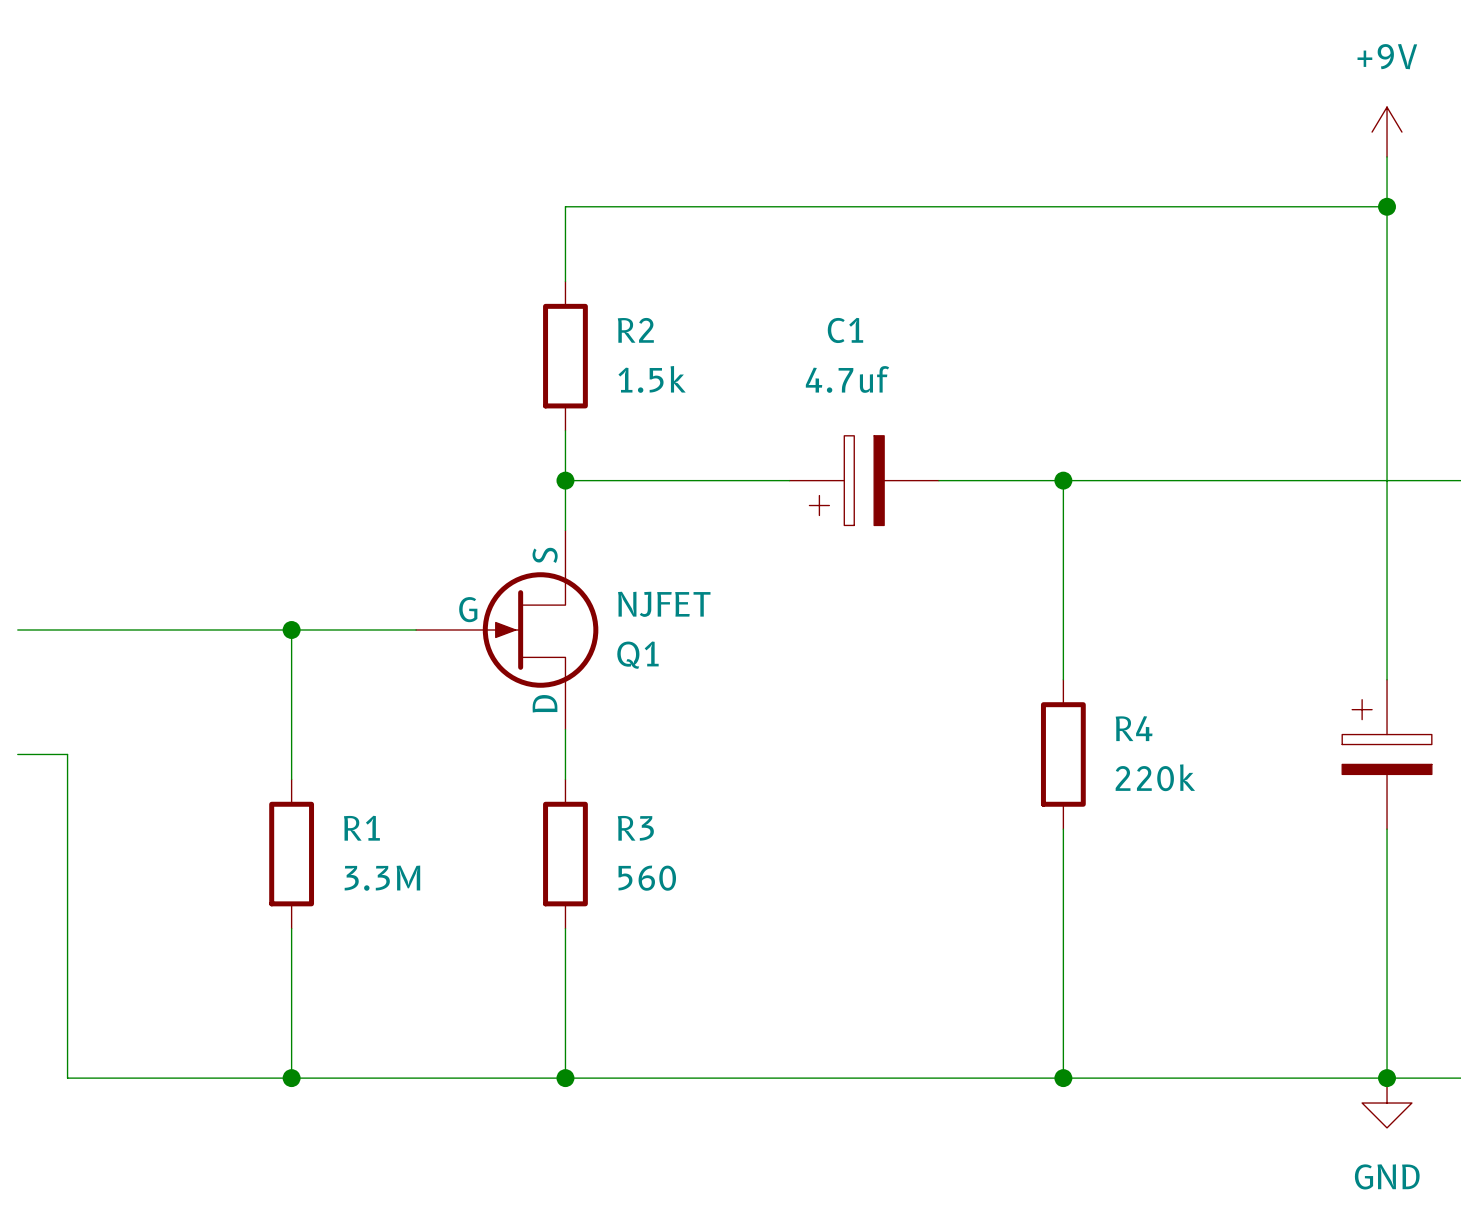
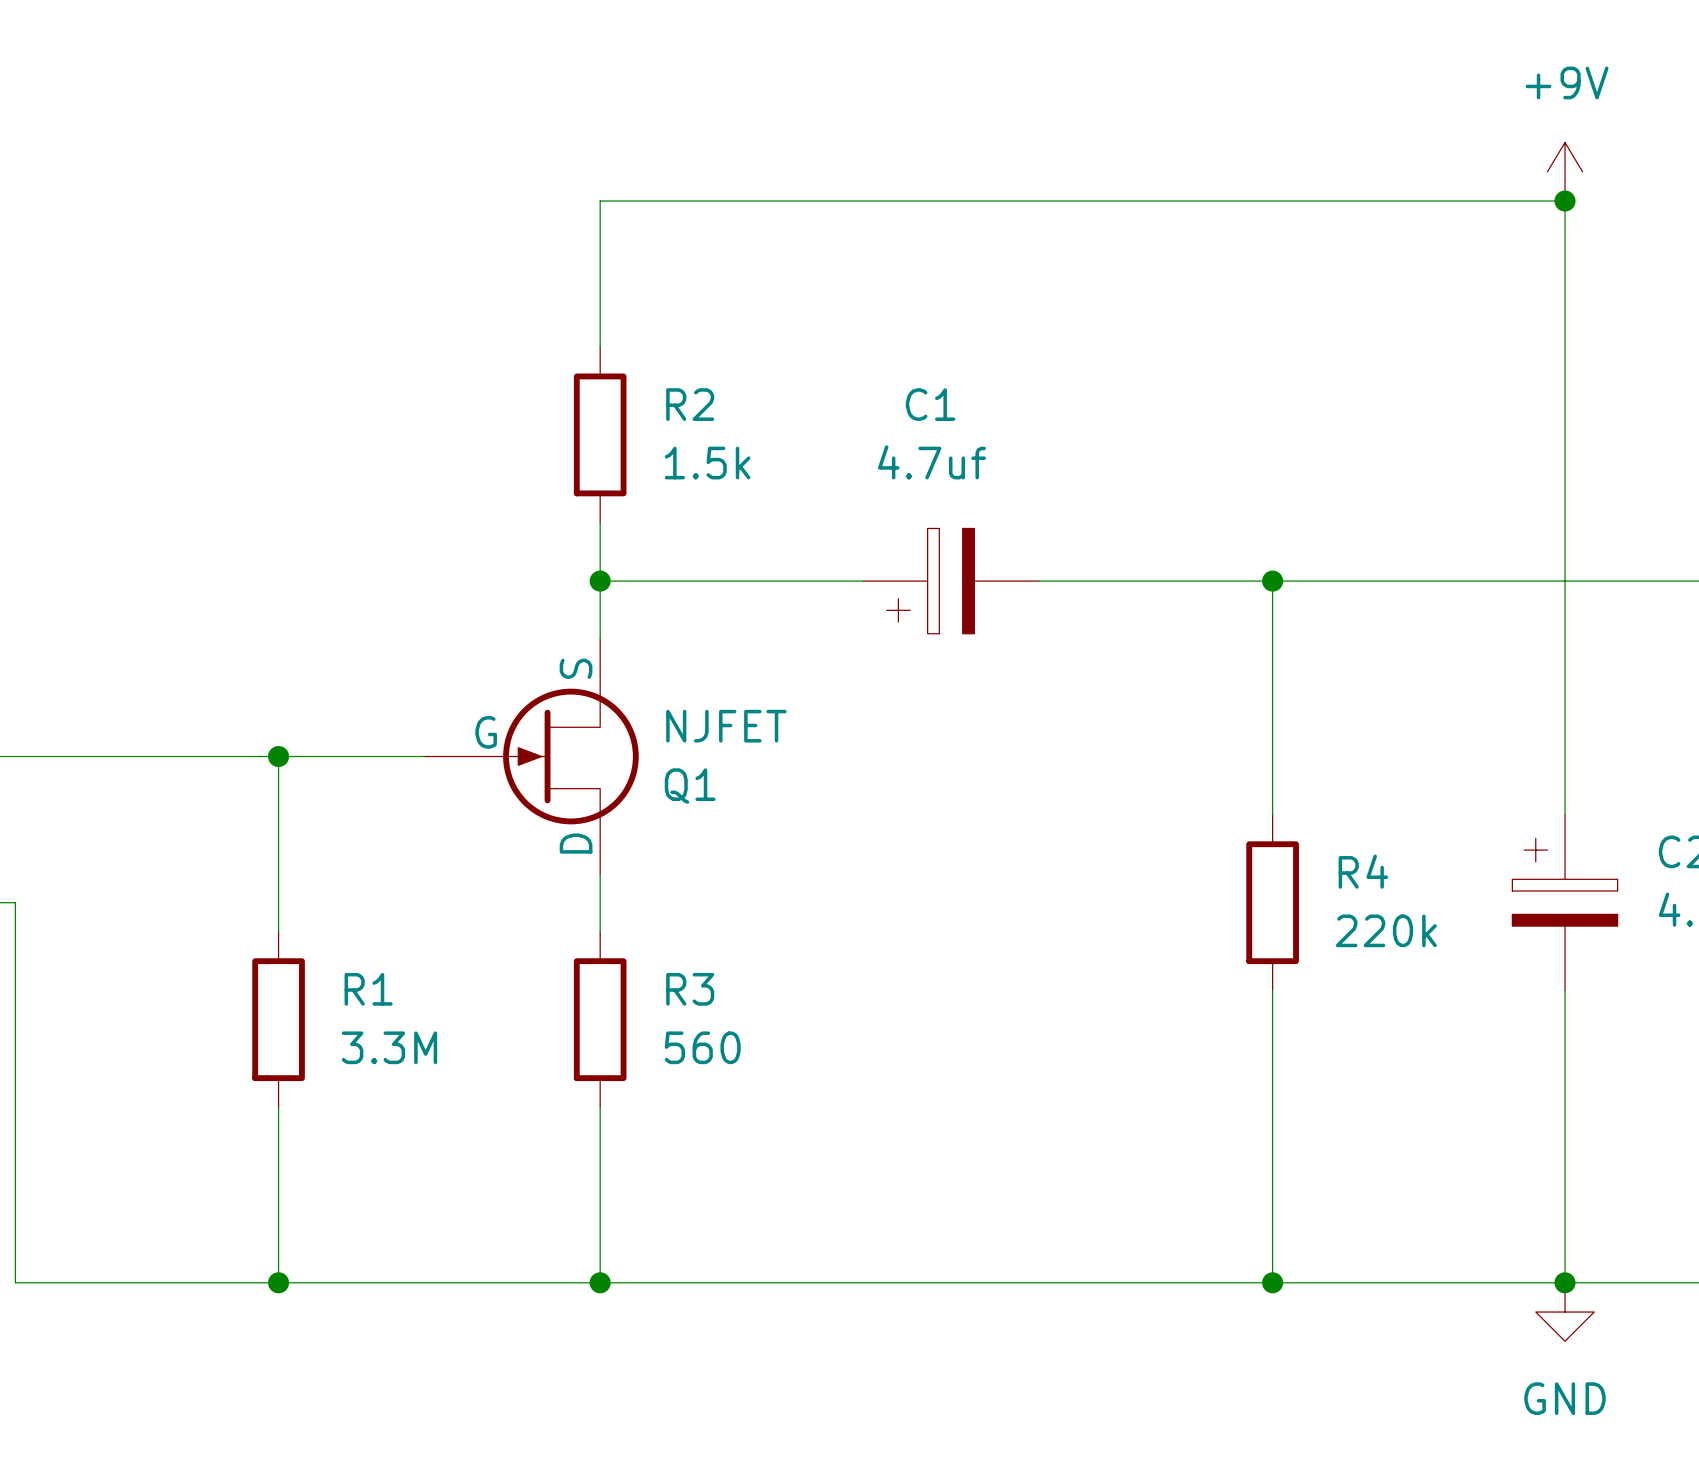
wire: (565, 206) (1387, 206) -> (600, 259) (600, 201) (1565, 201)
junction position: (1387, 206) -> (1565, 201)
wire: (1063, 480) (1063, 679) -> (1272, 581) (1272, 814)
junction position: (1063, 480) -> (1272, 581)
R4 position: (1063, 754) -> (1272, 902)
wire: (1063, 829) (1063, 1078) -> (1272, 990) (1272, 1282)
junction position: (1063, 1078) -> (1272, 1282)

